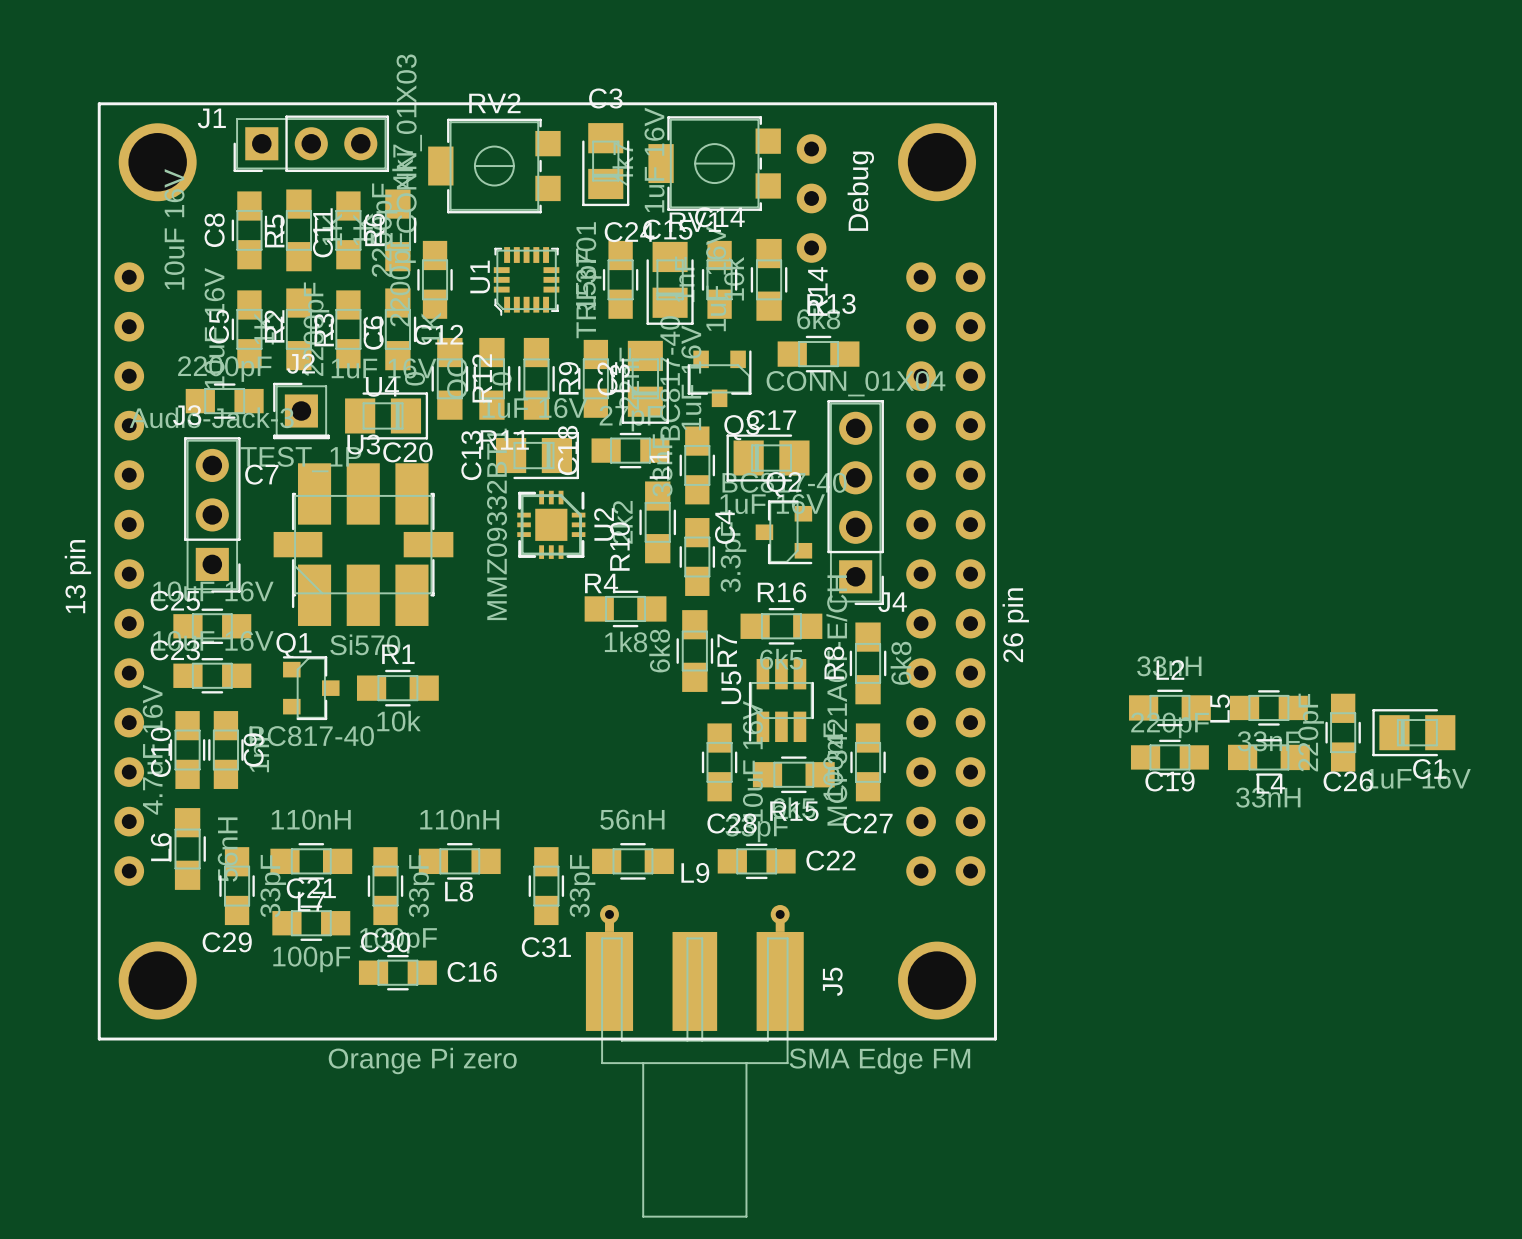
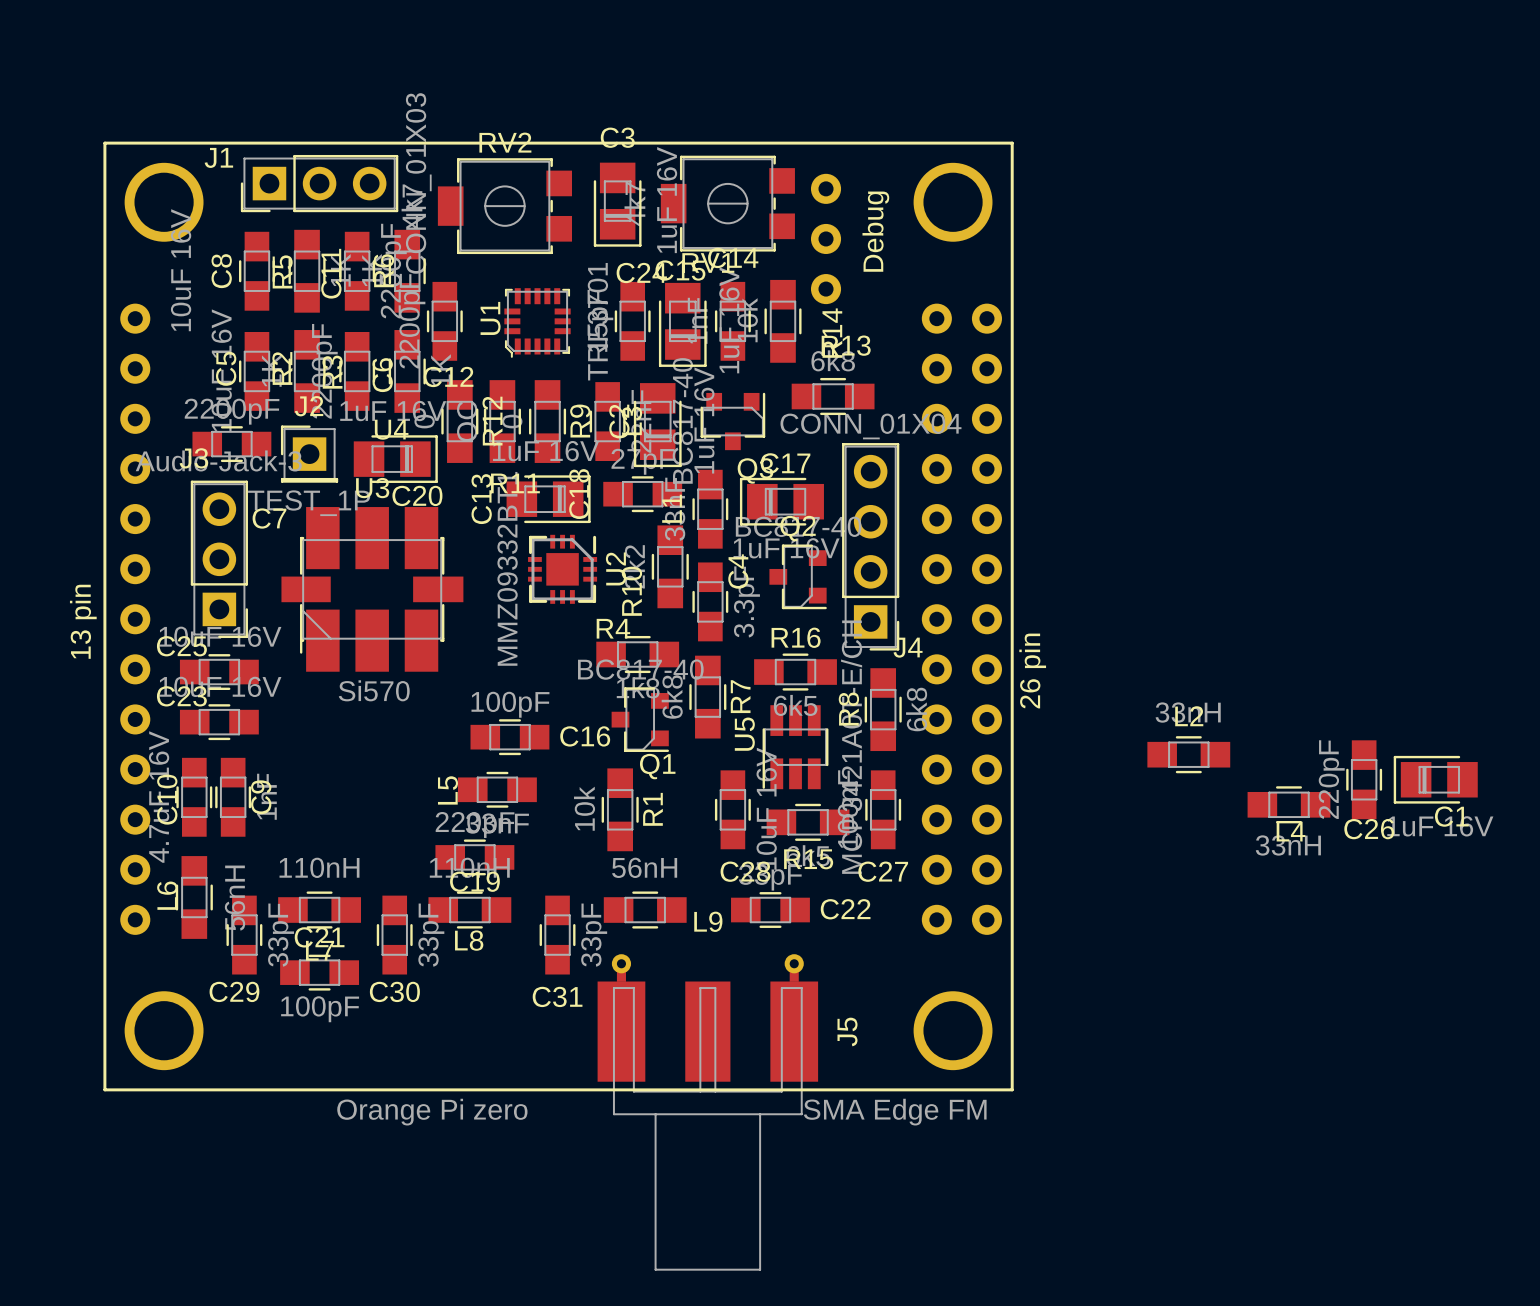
Q1 rotation: 0° (311, 688) -> 180° (640, 719)
Q1 position: (311, 688) -> (640, 719)
R1 rotation: 0° (397, 688) -> 90° clockwise (620, 809)
R1 position: (397, 688) -> (620, 809)
L5 position: (1268, 707) -> (497, 789)
C19 position: (1169, 757) -> (474, 857)
C16 position: (397, 972) -> (509, 737)

